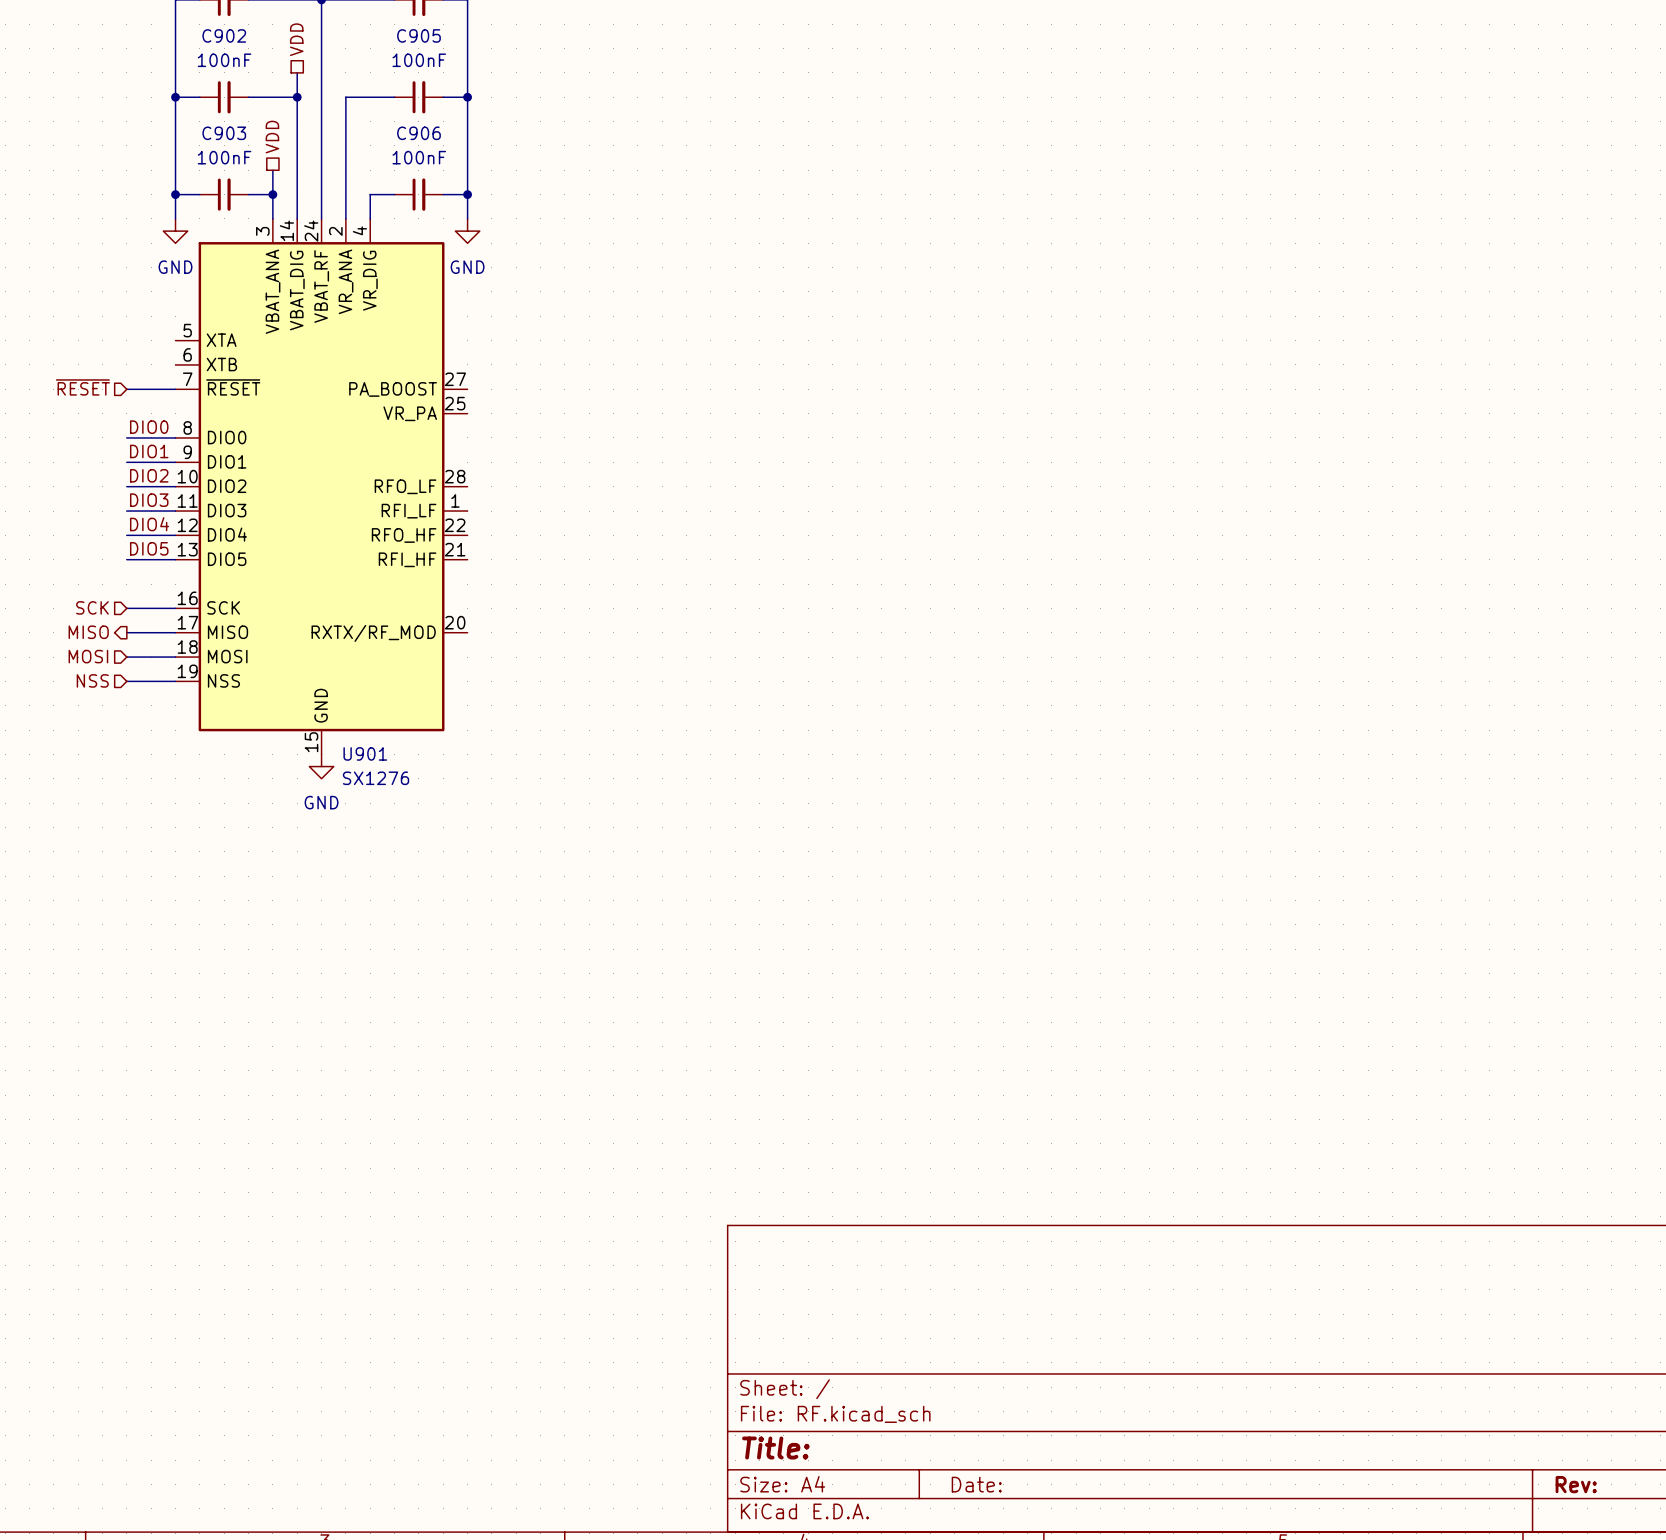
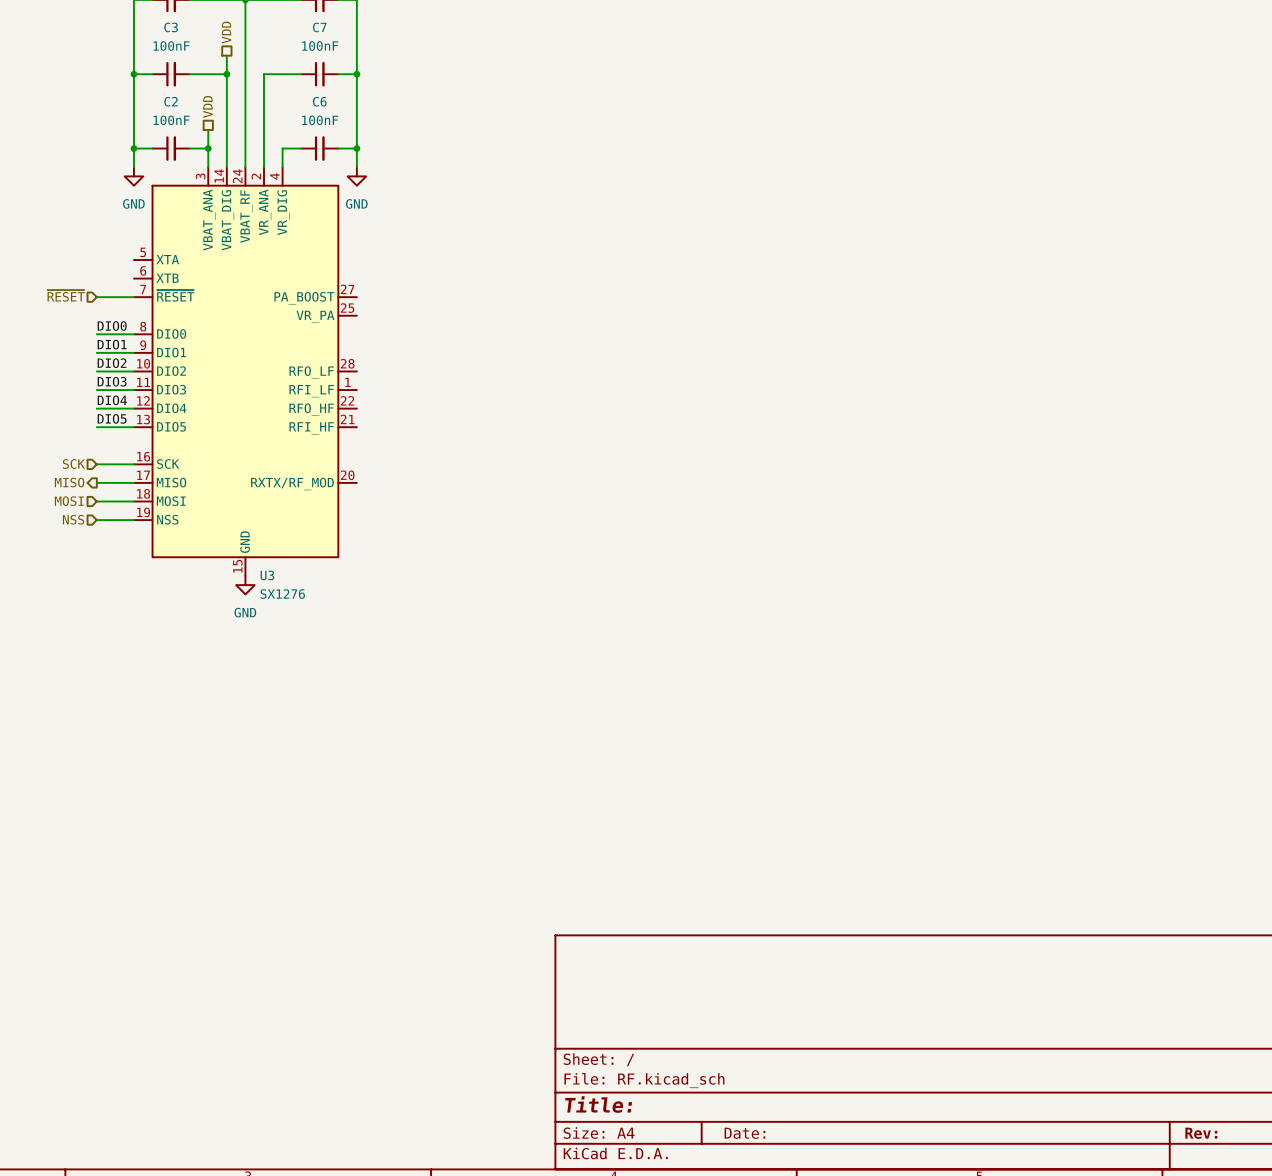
C902 name: C902 (224, 35) -> C3 (171, 27)
C905 name: C905 (418, 35) -> C7 (319, 27)
C903 name: C903 (224, 133) -> C2 (171, 101)
C906 name: C906 (418, 133) -> C6 (319, 101)
U901 name: U901 (365, 753) -> U3 (267, 575)

